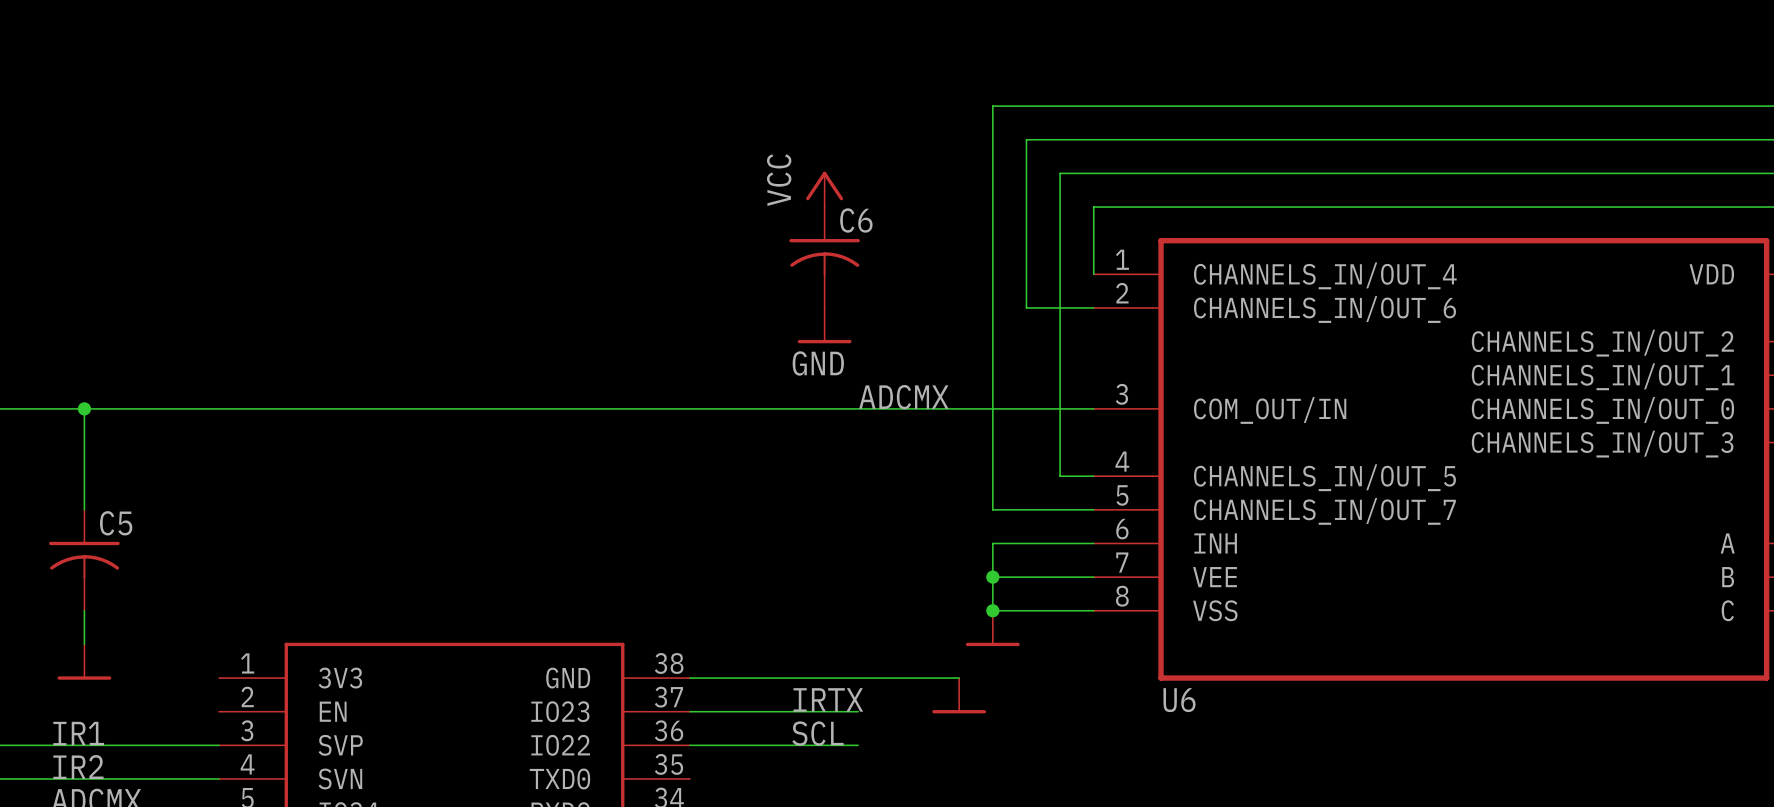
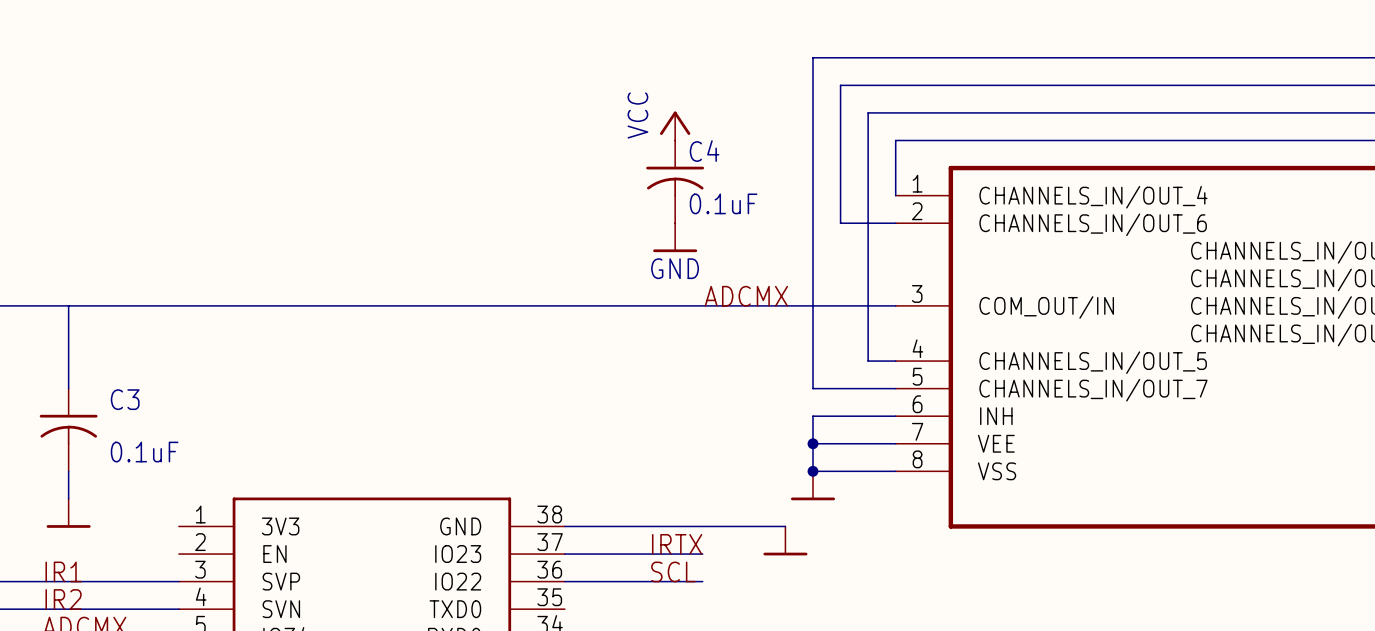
C6 name: C6 (856, 220) -> C4 (704, 151)
C6 value: none -> 0.1uF (723, 203)
junction: (84, 408) -> none
C5 name: C5 (116, 523) -> C3 (125, 399)
C5 value: none -> 0.1uF (144, 452)
U6 name: U6 (1179, 700) -> none

